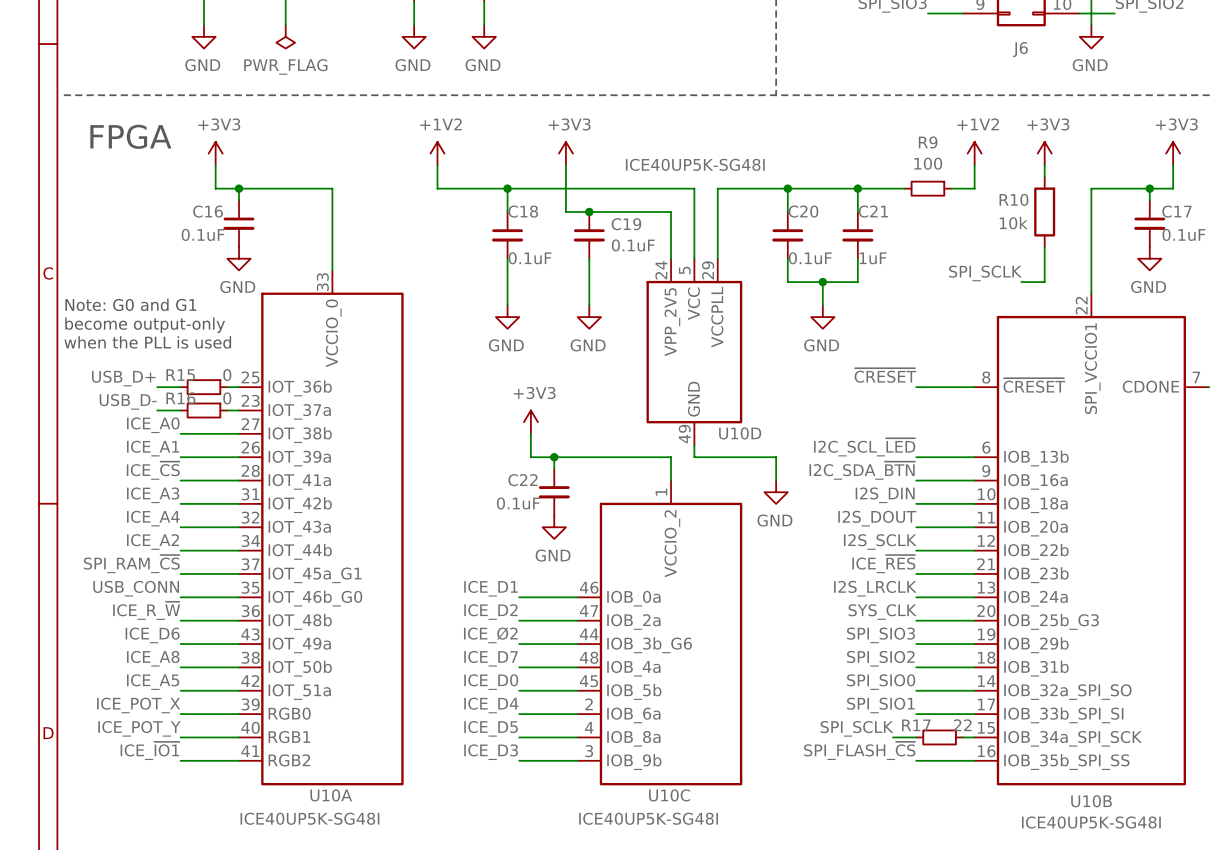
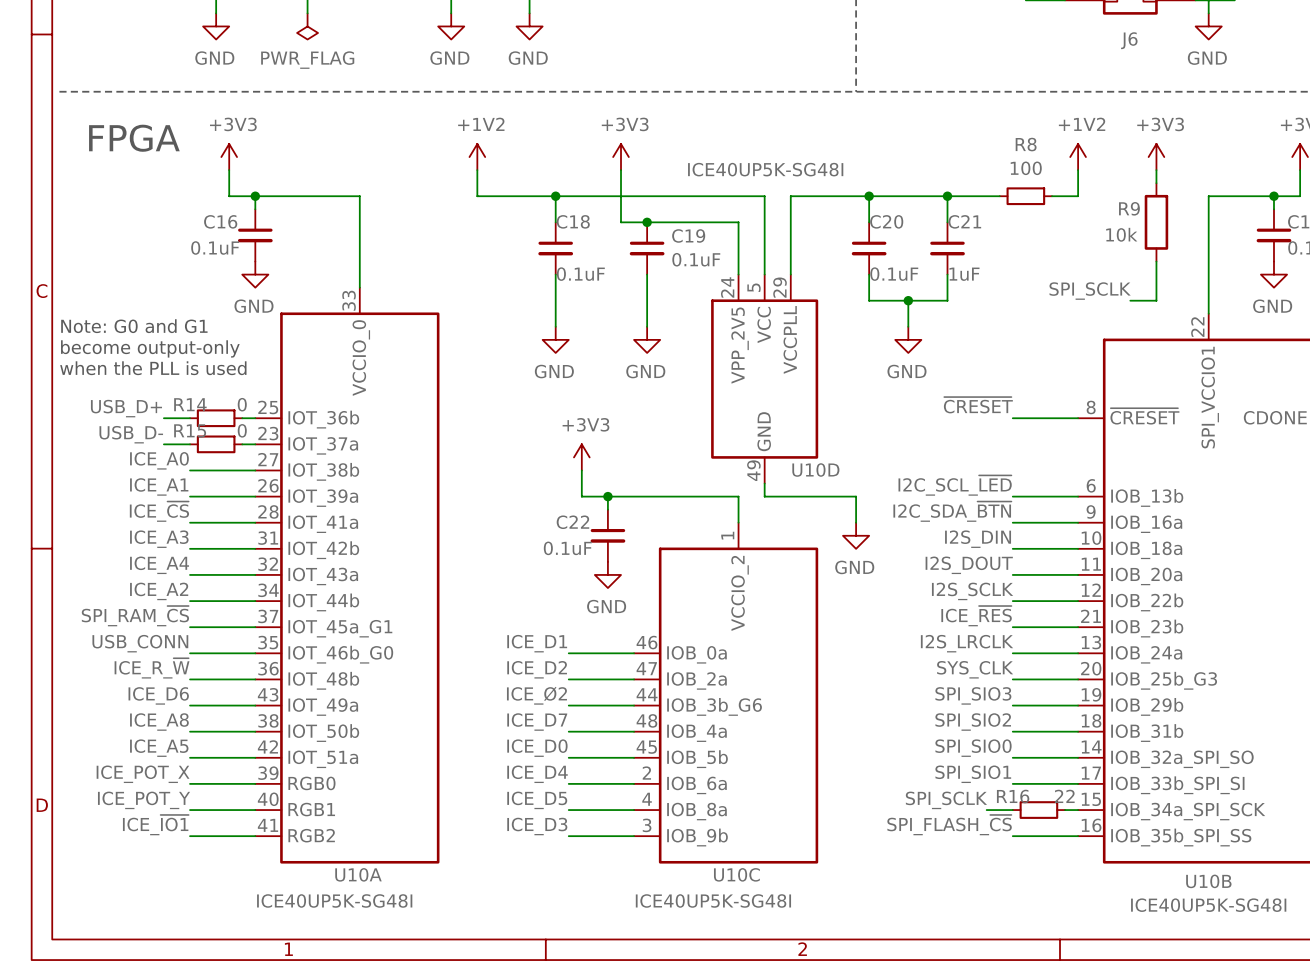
R9 name: R9 (928, 142) -> R8 (1026, 144)
R10 name: R10 (1013, 199) -> R9 (1129, 208)
R15 name: R15 (180, 375) -> R14 (190, 404)
R16 name: R16 (180, 398) -> R15 (190, 430)
R17 name: R17 (916, 725) -> R16 (1013, 796)

